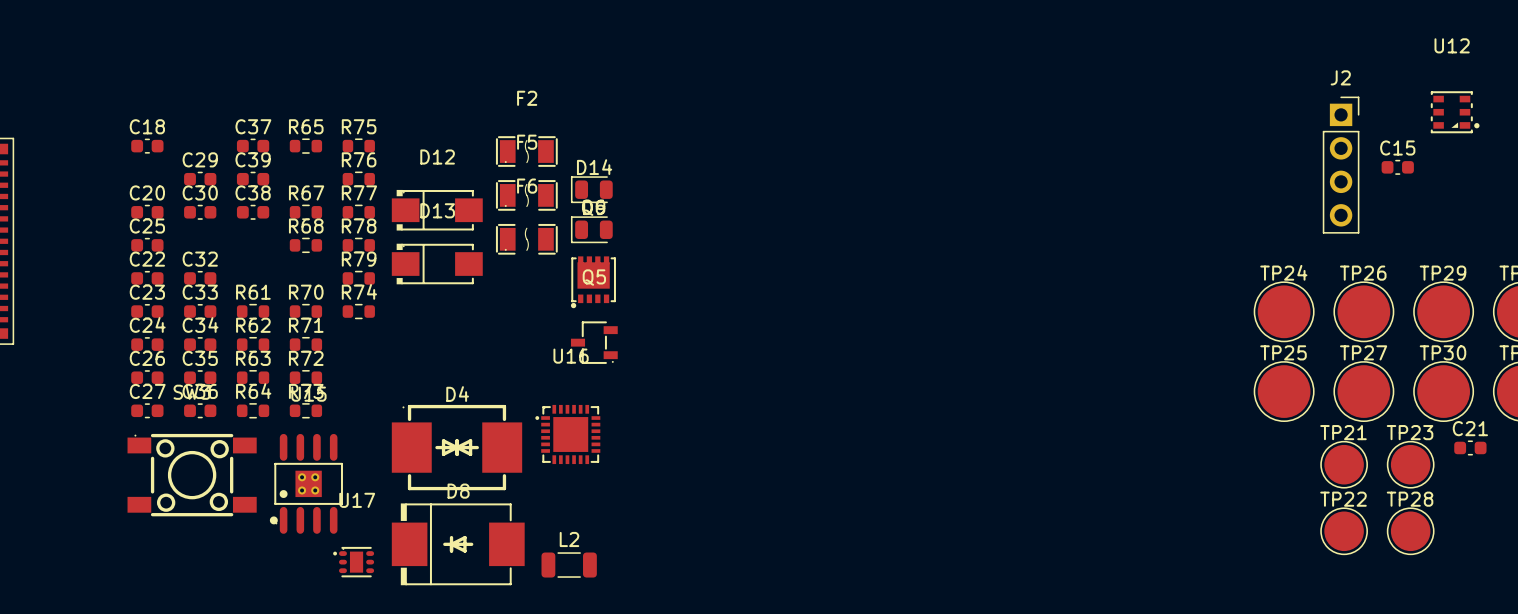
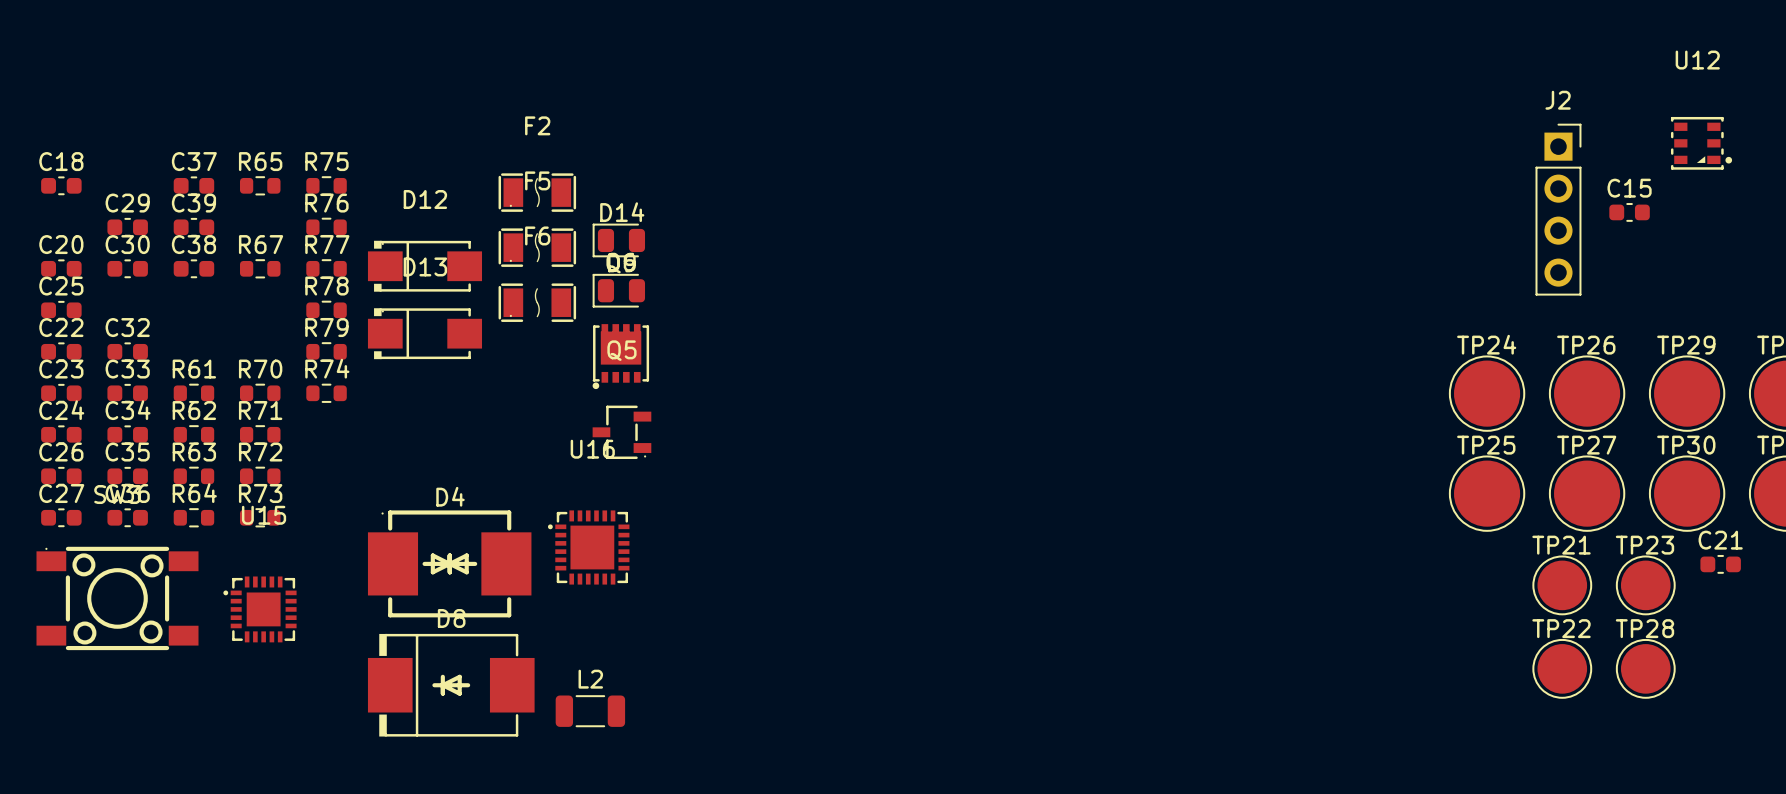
R68: (305, 245) -> none
U15 footprint: [269, 433, 343, 534] -> [223, 576, 297, 643]
U17: (353, 562) -> none

